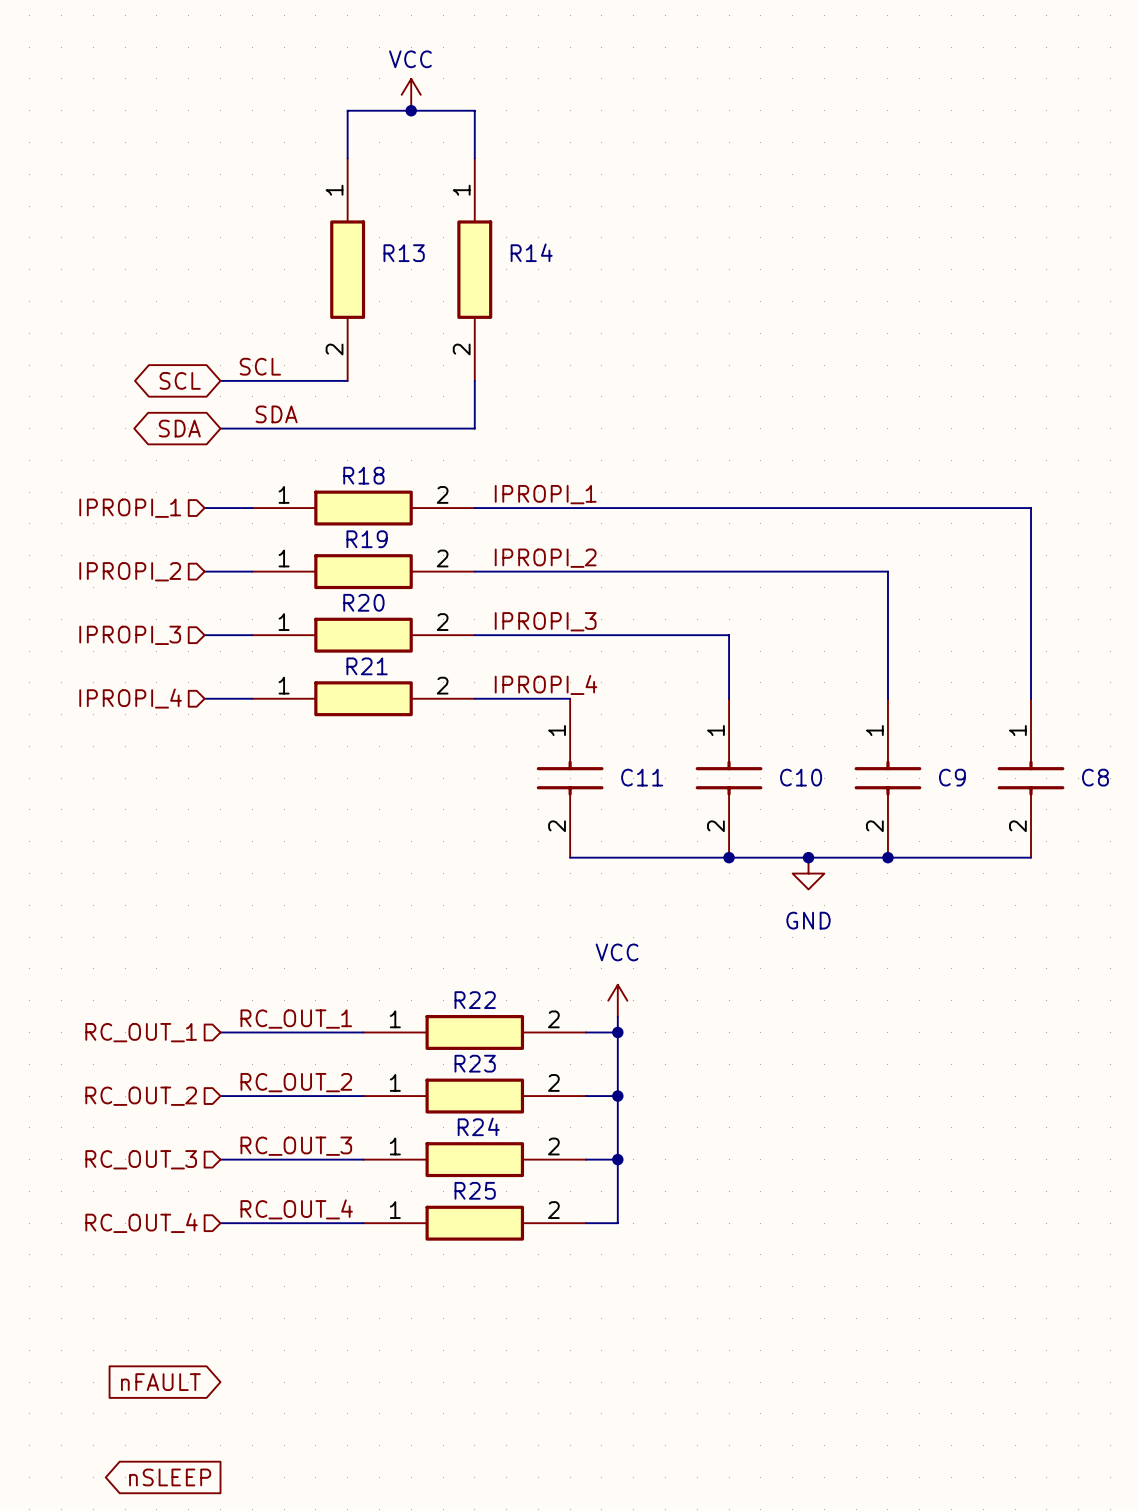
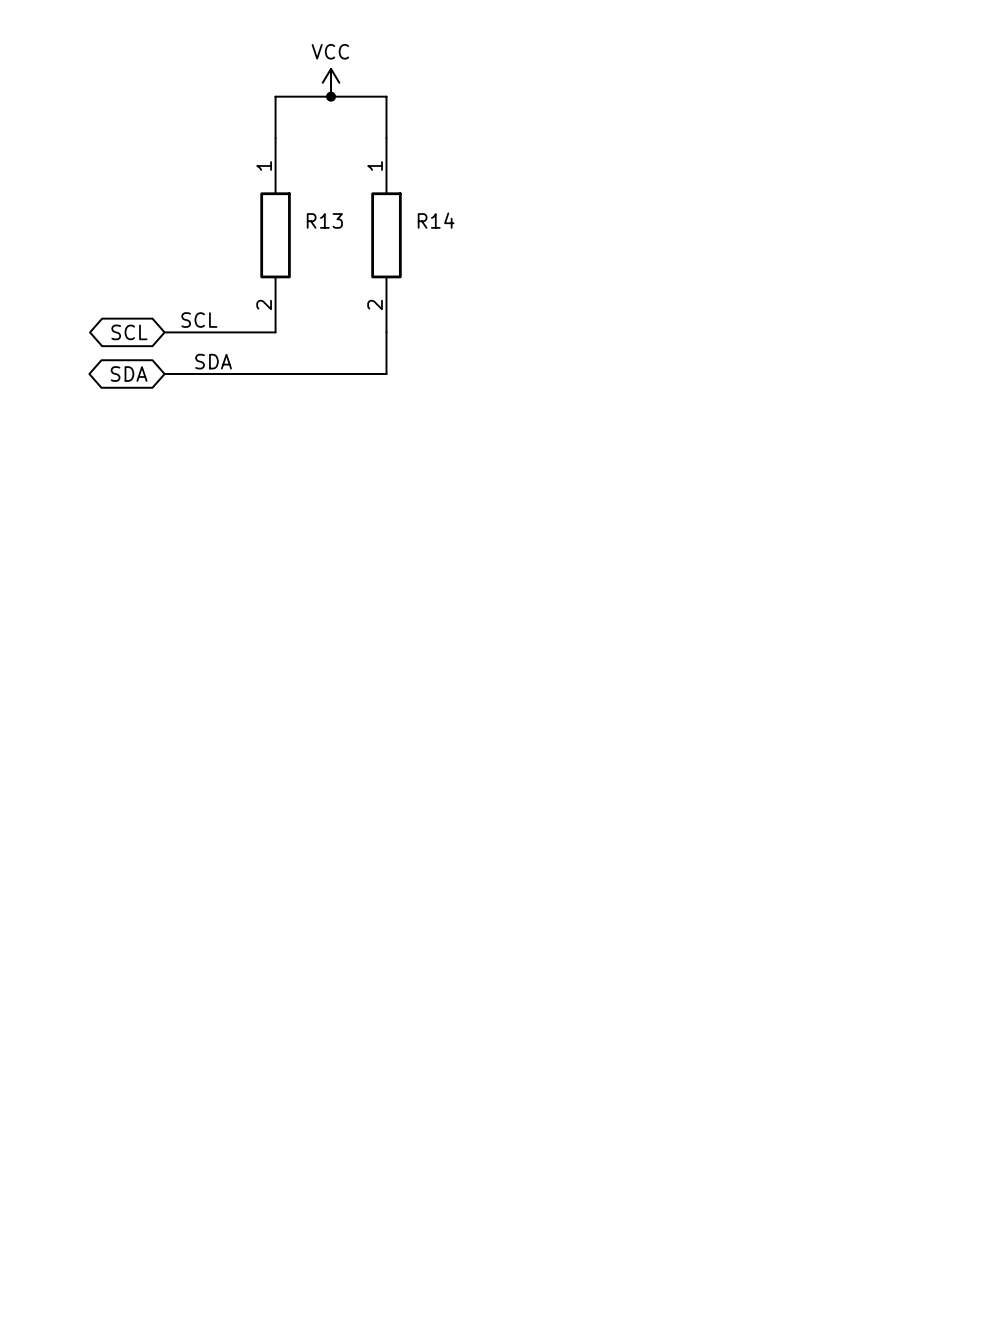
label: IPROPI_1 (545, 494) -> none
hierarchical label: IPROPI_1 (130, 508) -> none
wire: (204, 508) (252, 508) -> none
R18: (363, 508) -> none
wire: (474, 508) (1031, 508) (1031, 698) -> none
label: IPROPI_2 (545, 558) -> none
hierarchical label: IPROPI_2 (130, 571) -> none
wire: (204, 571) (252, 571) -> none
R19: (363, 571) -> none
wire: (474, 571) (887, 571) (887, 698) -> none
label: IPROPI_3 (545, 621) -> none
hierarchical label: IPROPI_3 (130, 635) -> none
wire: (204, 635) (252, 635) -> none
R20: (363, 635) -> none
wire: (474, 635) (729, 635) (729, 698) -> none
label: IPROPI_4 (546, 684) -> none
hierarchical label: IPROPI_4 (130, 698) -> none
wire: (204, 698) (252, 698) -> none
R21: (363, 698) -> none
wire: (474, 698) (570, 698) -> none
C11: (570, 778) -> none
C10: (729, 778) -> none
C9: (887, 778) -> none
C8: (1031, 778) -> none
wire: (570, 857) (1031, 857) -> none
junction: (729, 857) -> none
junction: (808, 857) -> none
junction: (887, 857) -> none
power symbol: GND (808, 873) -> none
power symbol: VCC (617, 1000) -> none
wire: (617, 1016) (617, 1223) (586, 1223) -> none
label: RC_OUT_1 (296, 1019) -> none
hierarchical label: RC_OUT_1 (141, 1032) -> none
wire: (220, 1032) (363, 1032) -> none
R22: (474, 1032) -> none
wire: (586, 1032) (617, 1032) -> none
junction: (617, 1032) -> none
label: RC_OUT_2 (296, 1082) -> none
hierarchical label: RC_OUT_2 (141, 1096) -> none
wire: (220, 1096) (363, 1096) -> none
R23: (474, 1096) -> none
wire: (586, 1096) (617, 1096) -> none
junction: (617, 1096) -> none
label: RC_OUT_3 (296, 1146) -> none
hierarchical label: RC_OUT_3 (141, 1159) -> none
wire: (220, 1159) (363, 1159) -> none
R24: (474, 1159) -> none
wire: (586, 1159) (617, 1159) -> none
junction: (617, 1159) -> none
label: RC_OUT_4 (296, 1209) -> none
hierarchical label: RC_OUT_4 (141, 1222) -> none
wire: (220, 1223) (363, 1223) -> none
R25: (474, 1223) -> none
global label: nFAULT (160, 1382) -> none
global label: nSLEEP (170, 1477) -> none

